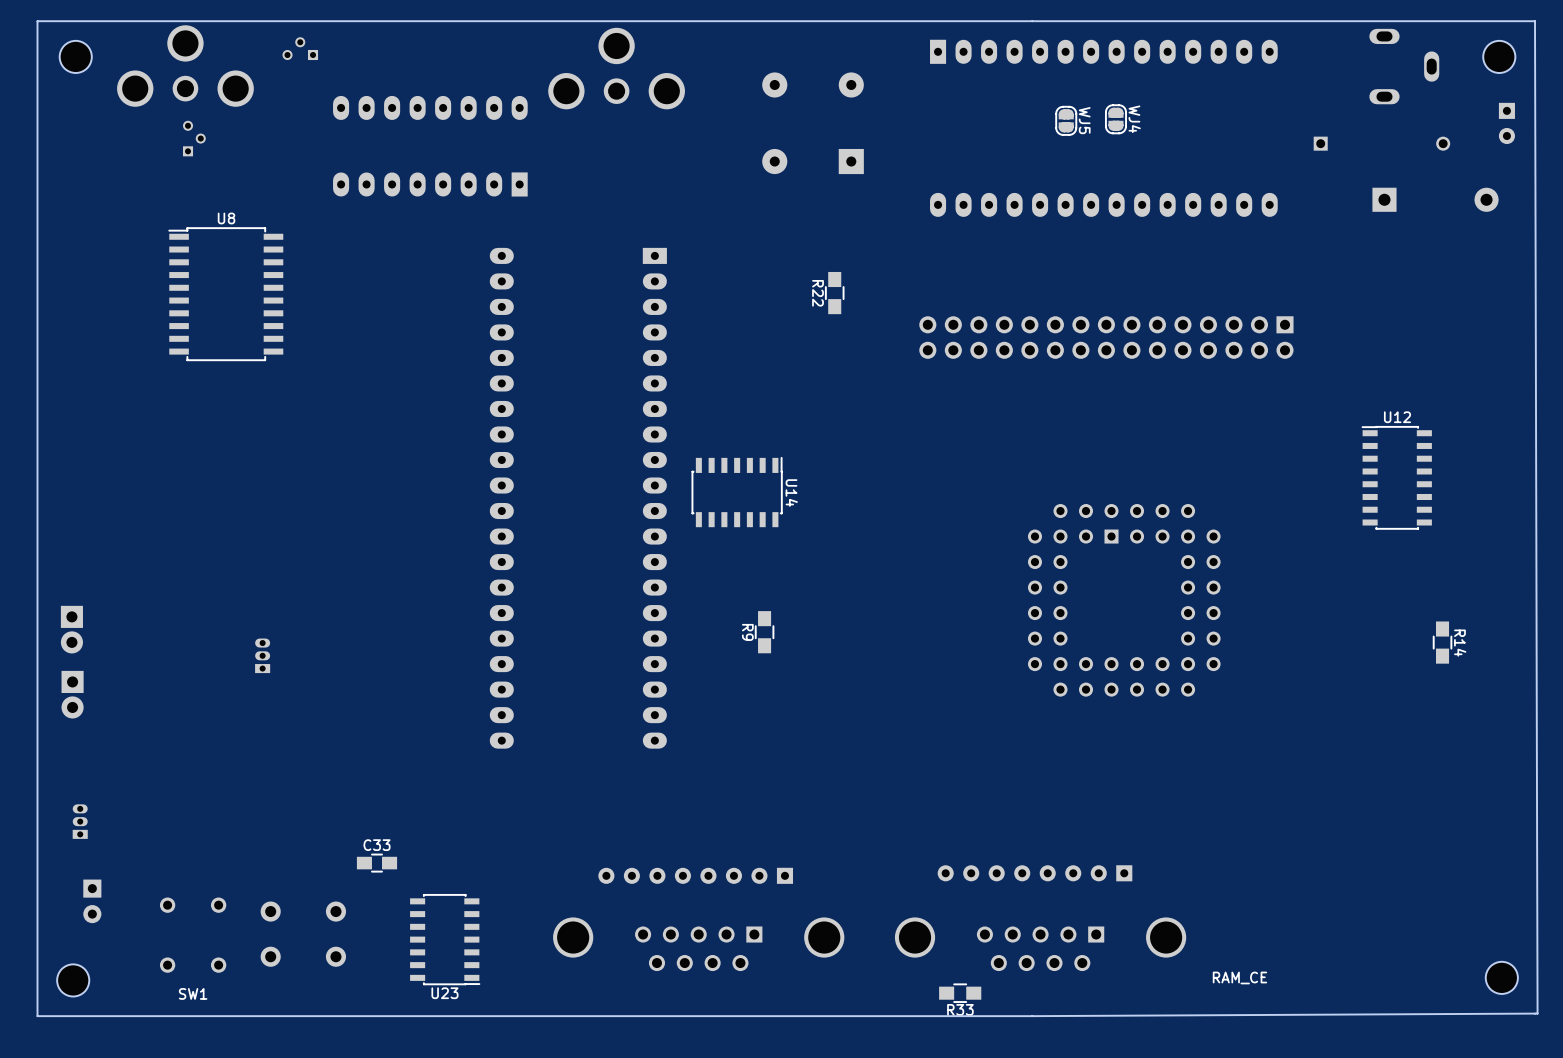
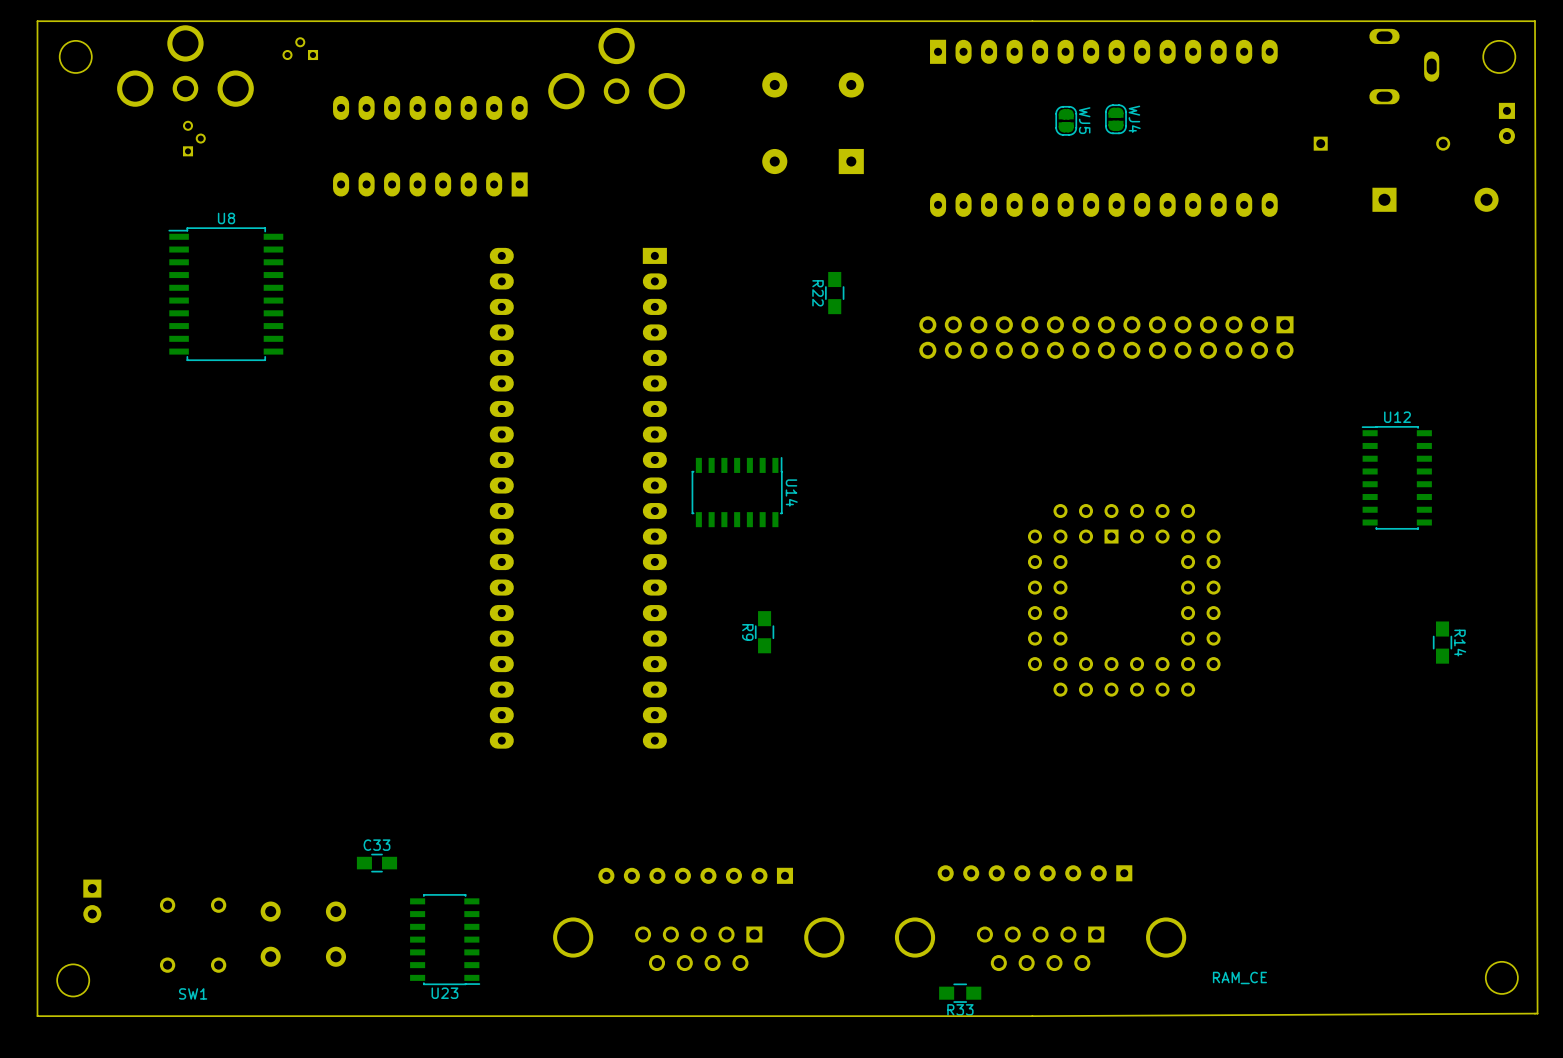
part: (71, 629) -> none
part: (262, 655) -> none
part: (72, 694) -> none
part: (80, 821) -> none

